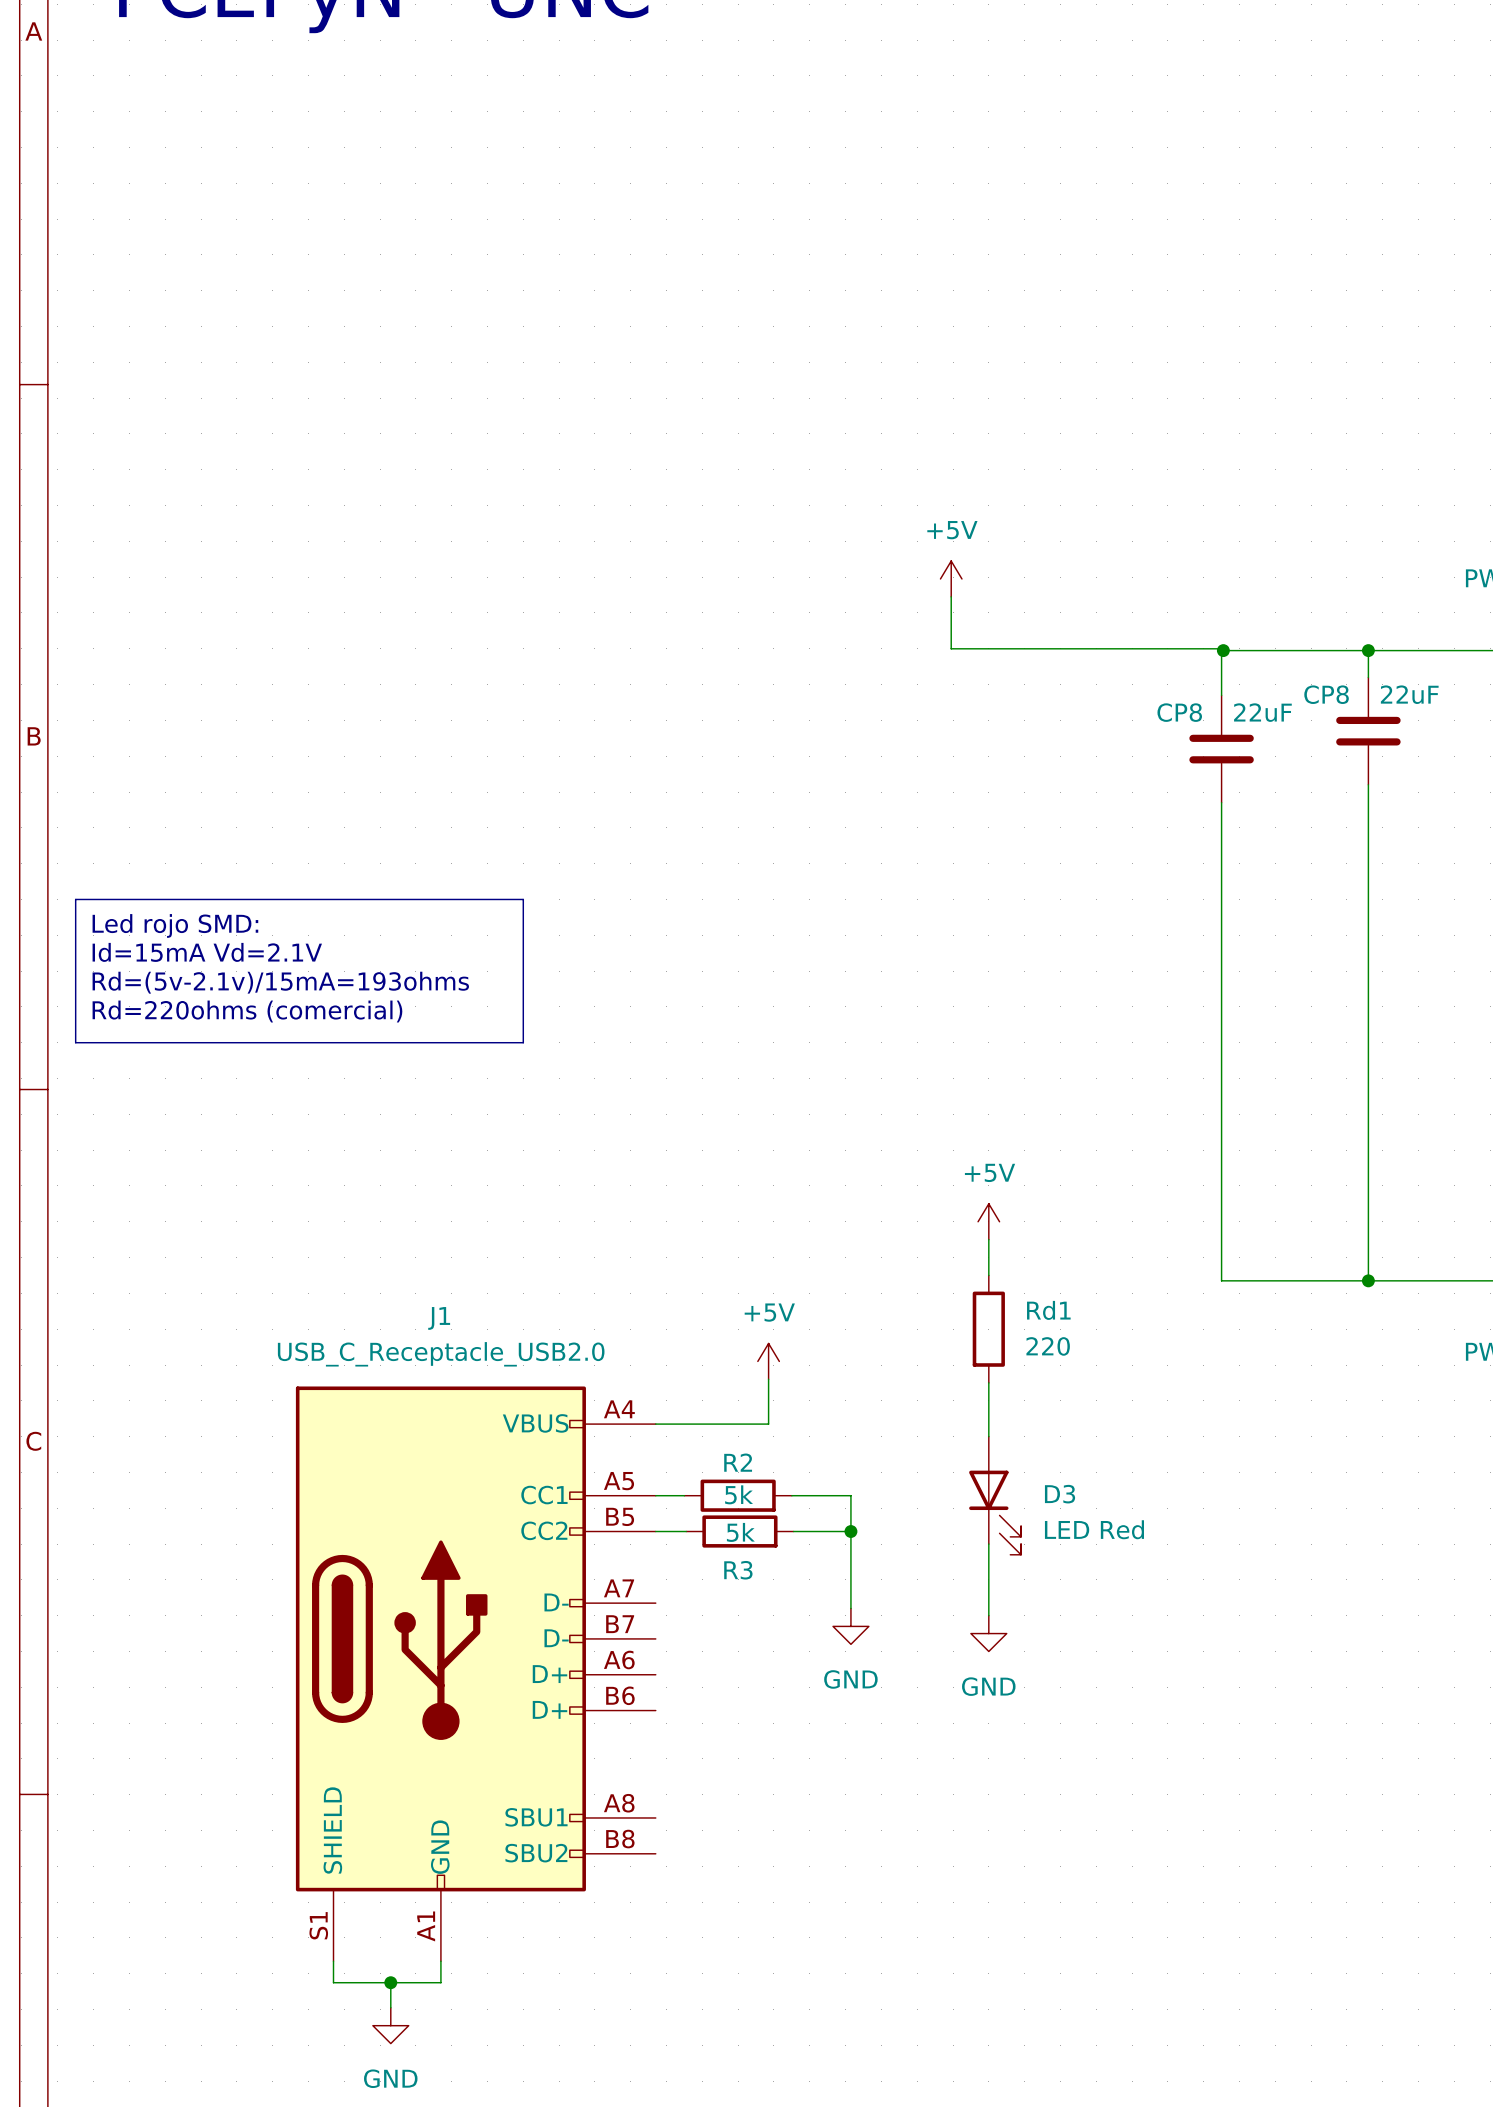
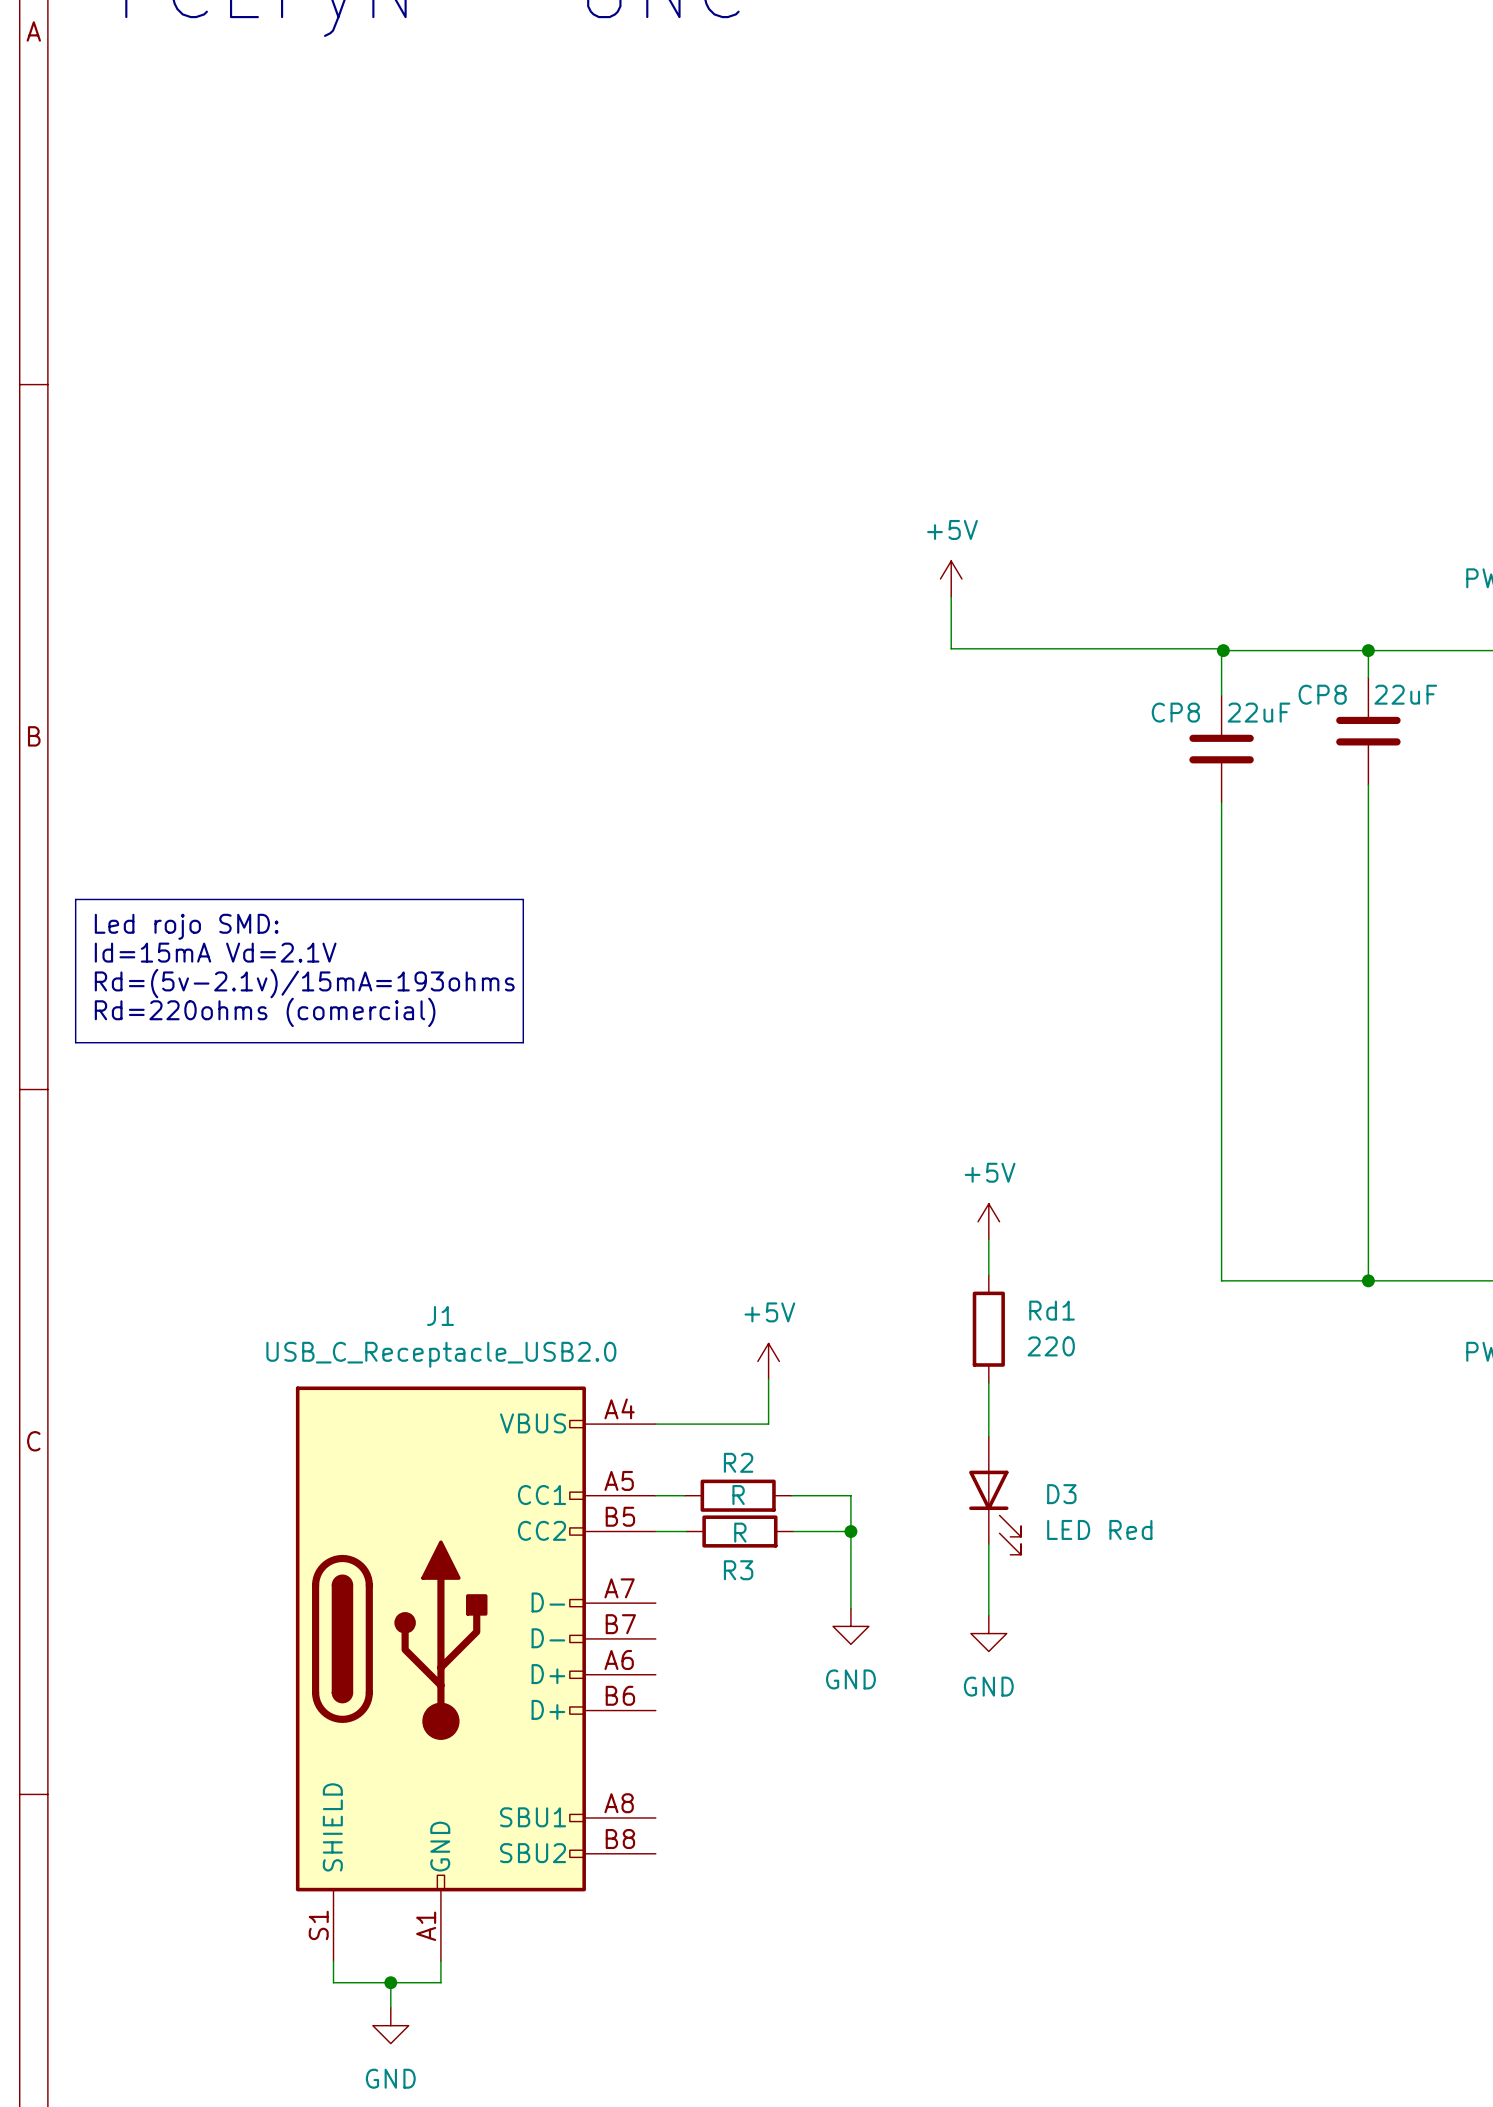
R2 value: 5k (739, 1494) -> R (738, 1495)
R3 value: 5k (740, 1532) -> R (740, 1532)

